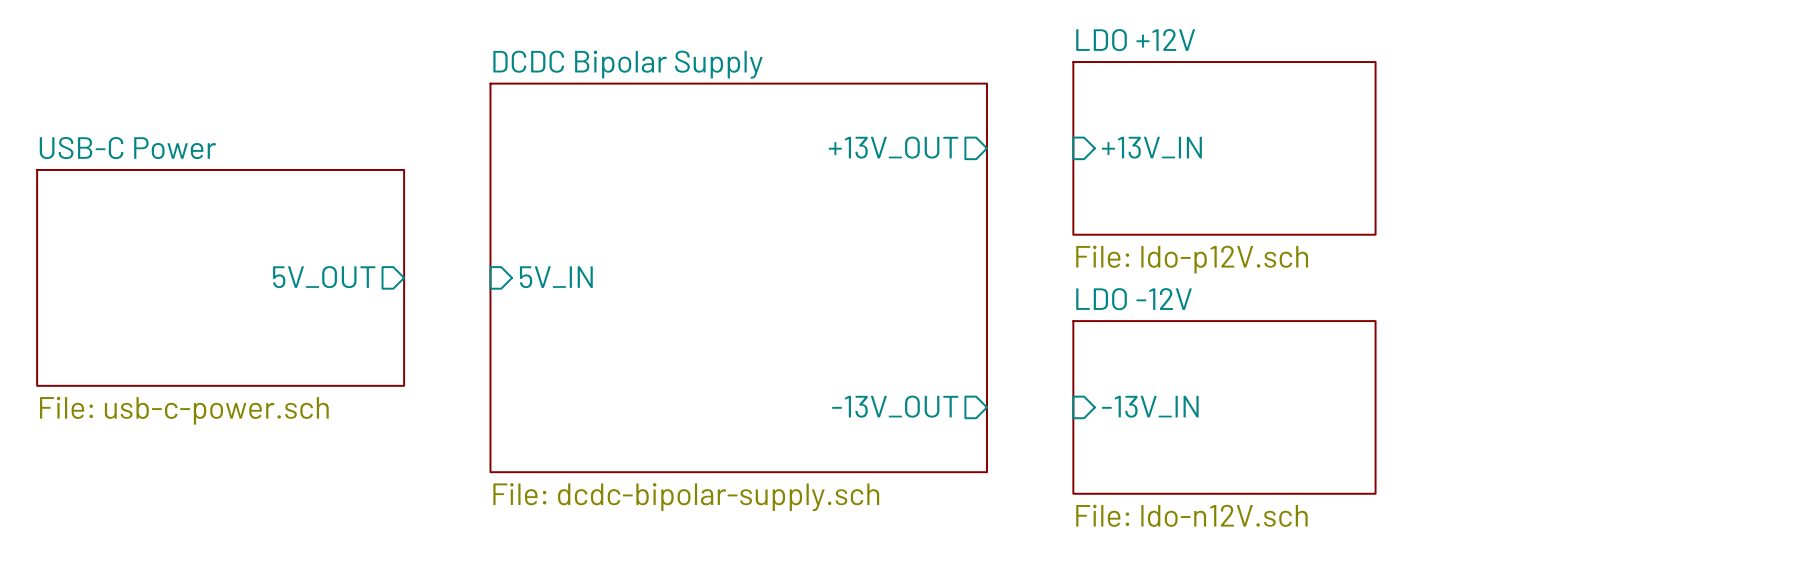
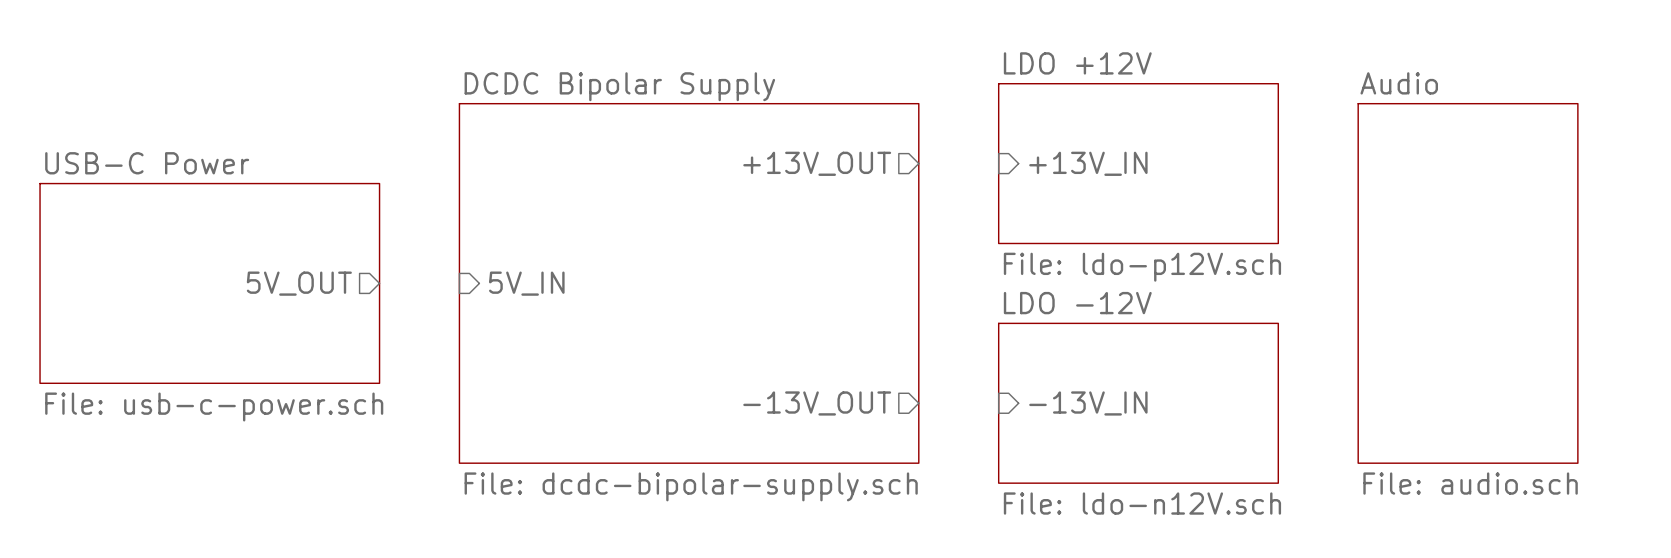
sheet Audio: none -> File: audio.sch (1468, 283)

